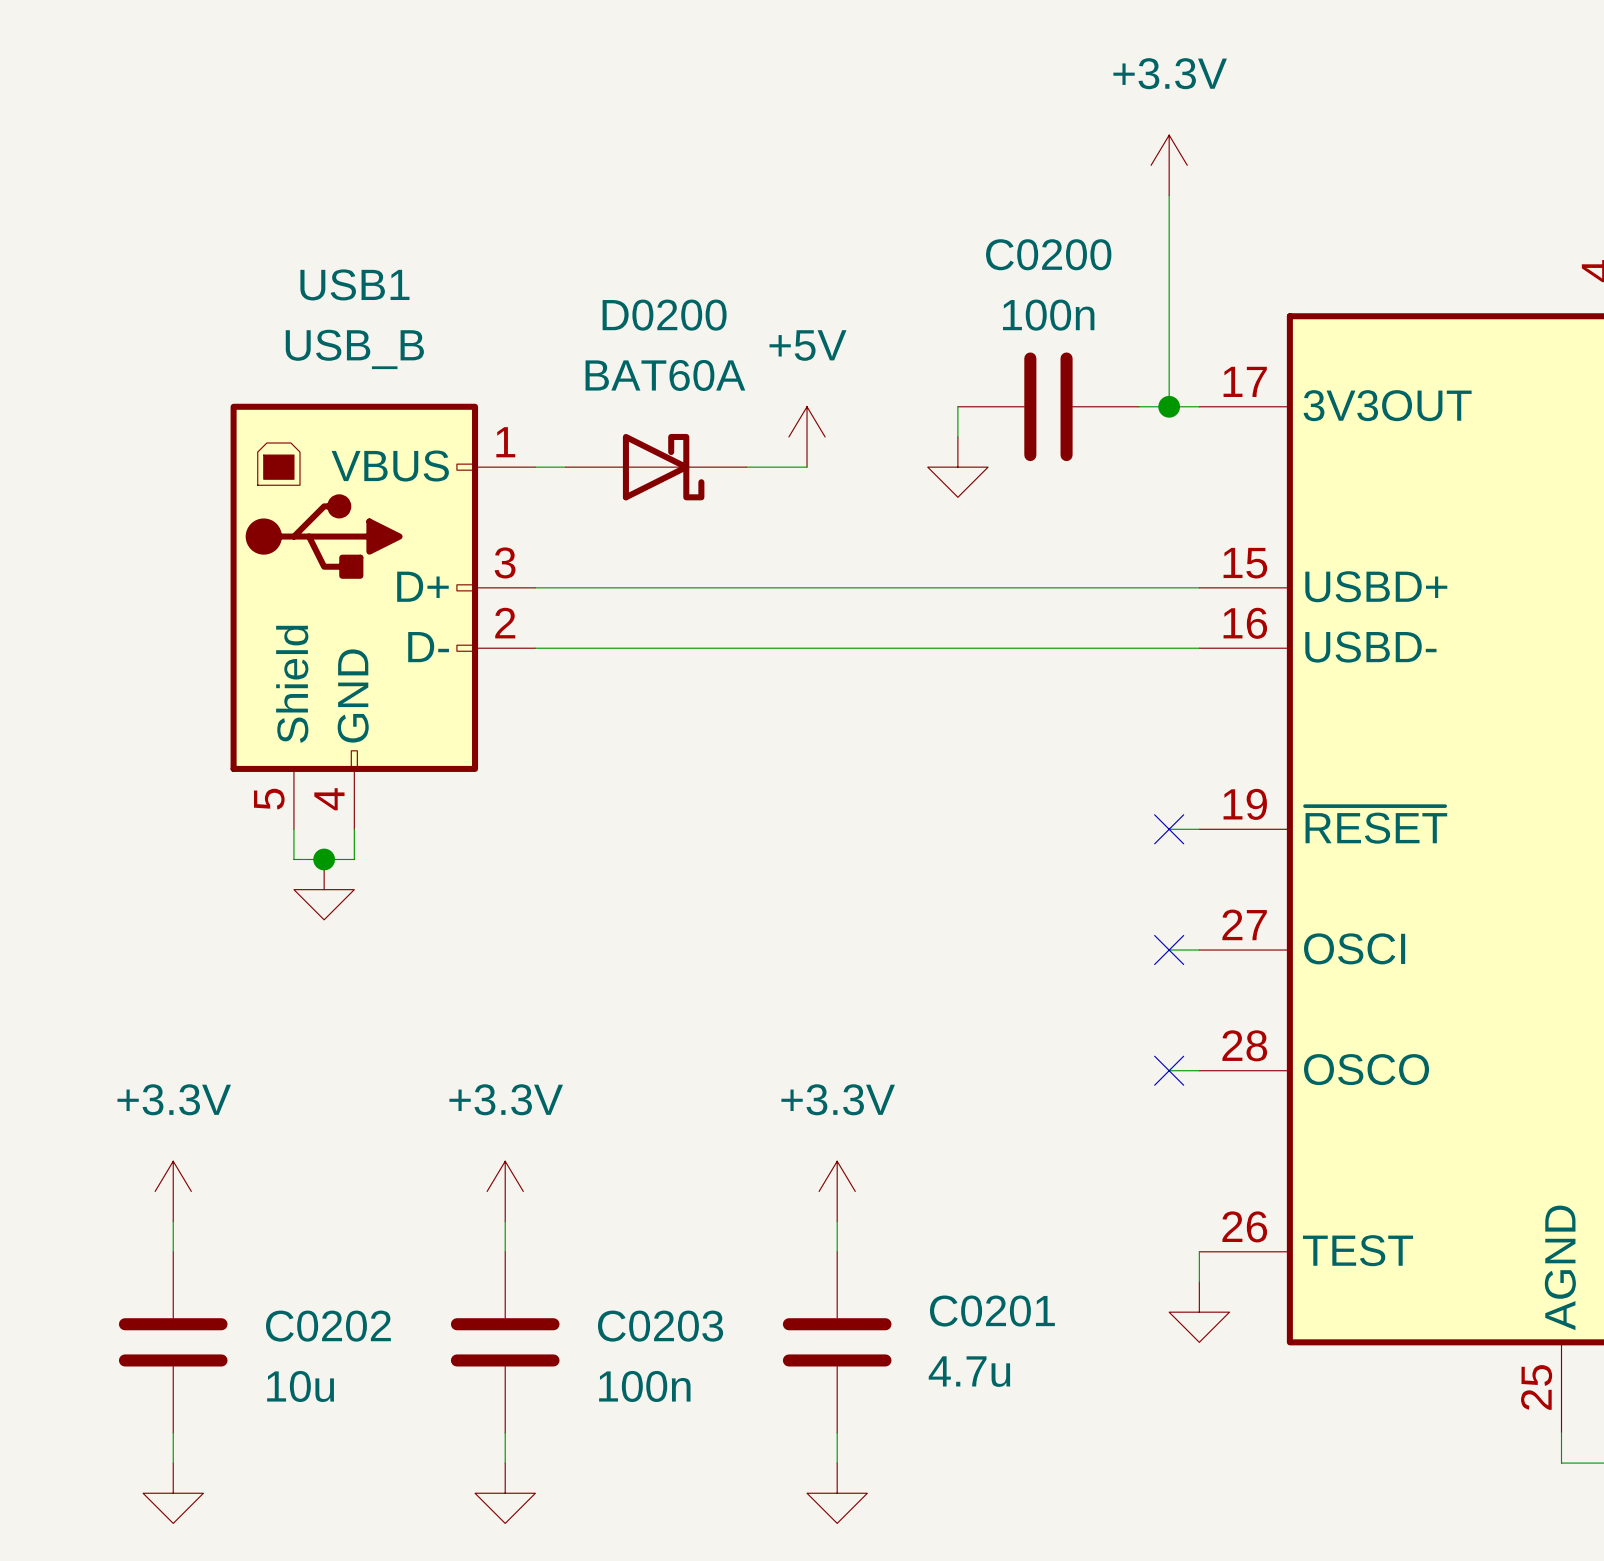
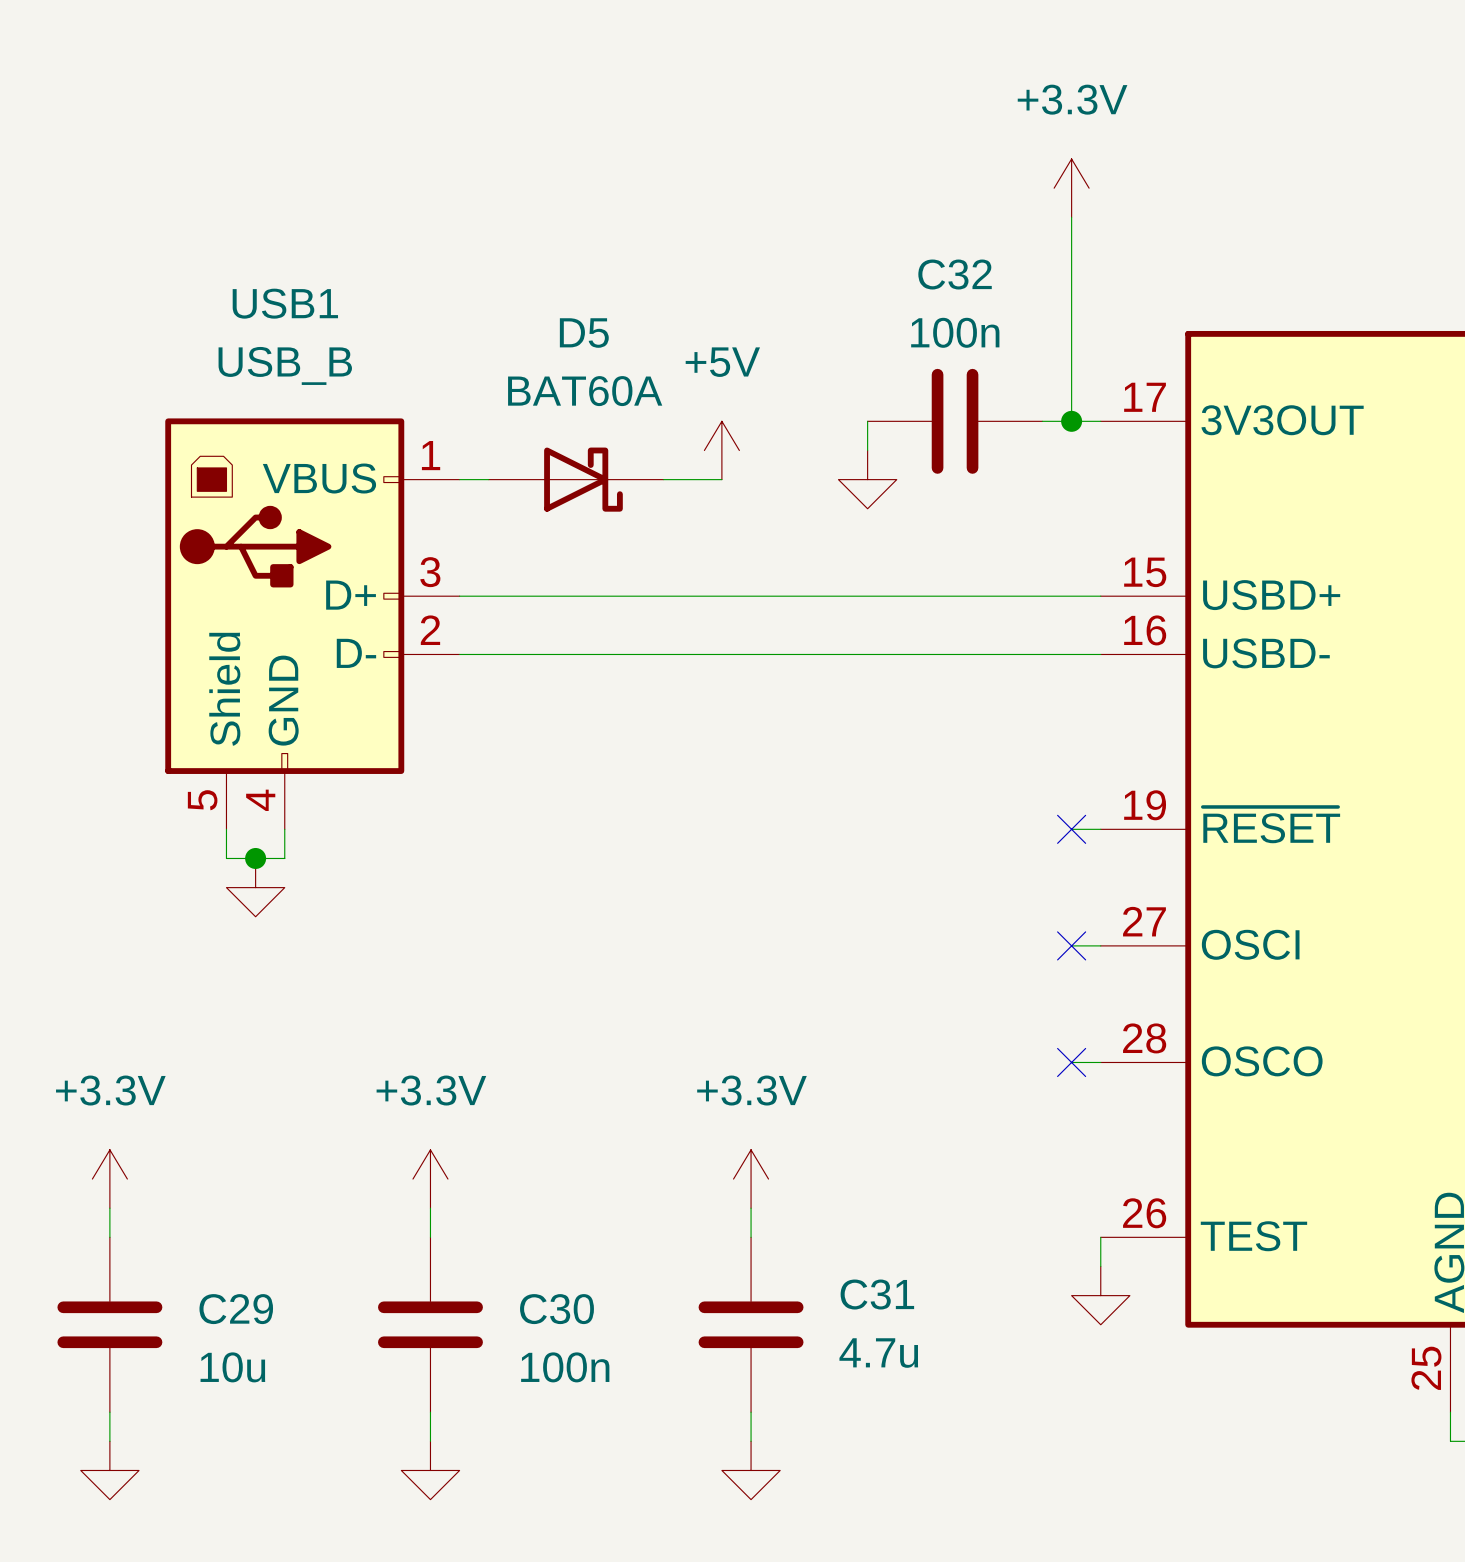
C0200 name: C0200 (1048, 254) -> C32 (955, 274)
D0200 name: D0200 (664, 315) -> D5 (584, 333)
C0201 name: C0201 (992, 1311) -> C31 (877, 1294)
C0202 name: C0202 (328, 1326) -> C29 (236, 1309)
C0203 name: C0203 (660, 1326) -> C30 (557, 1309)

